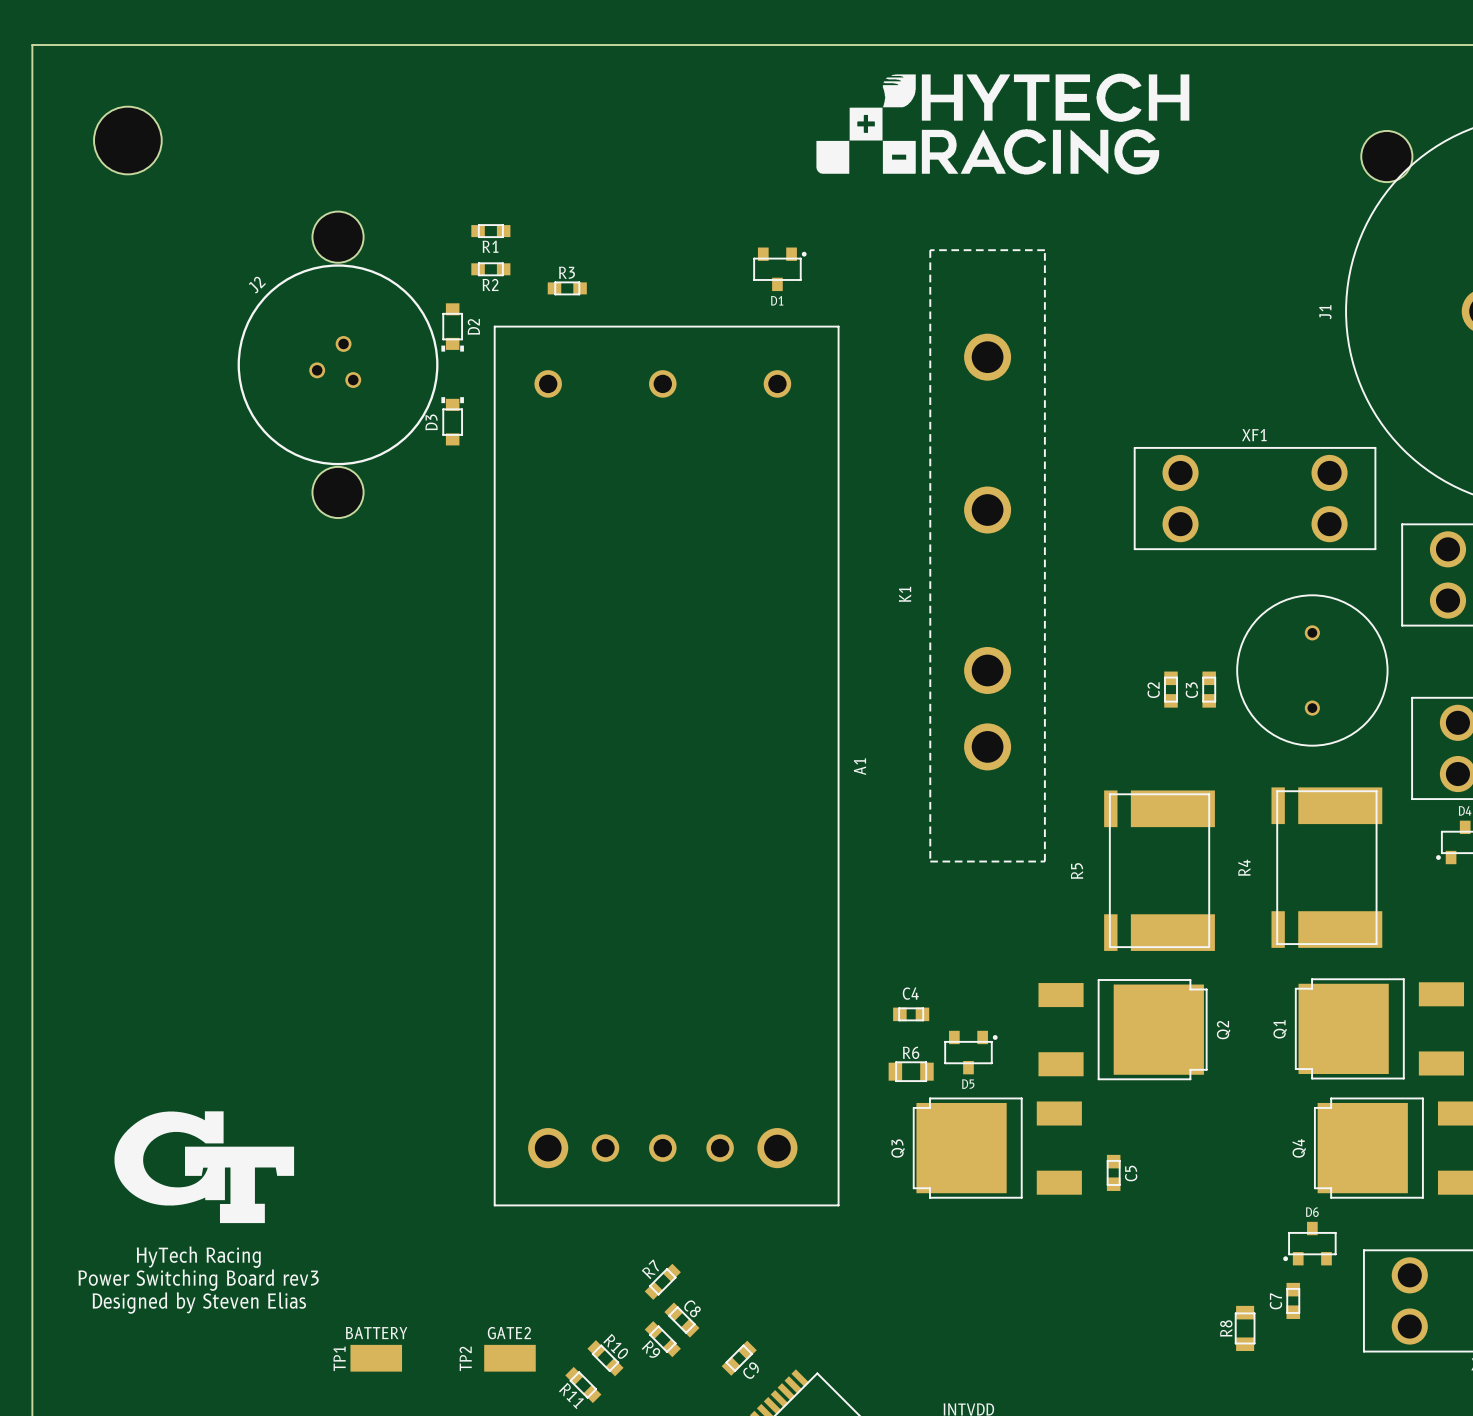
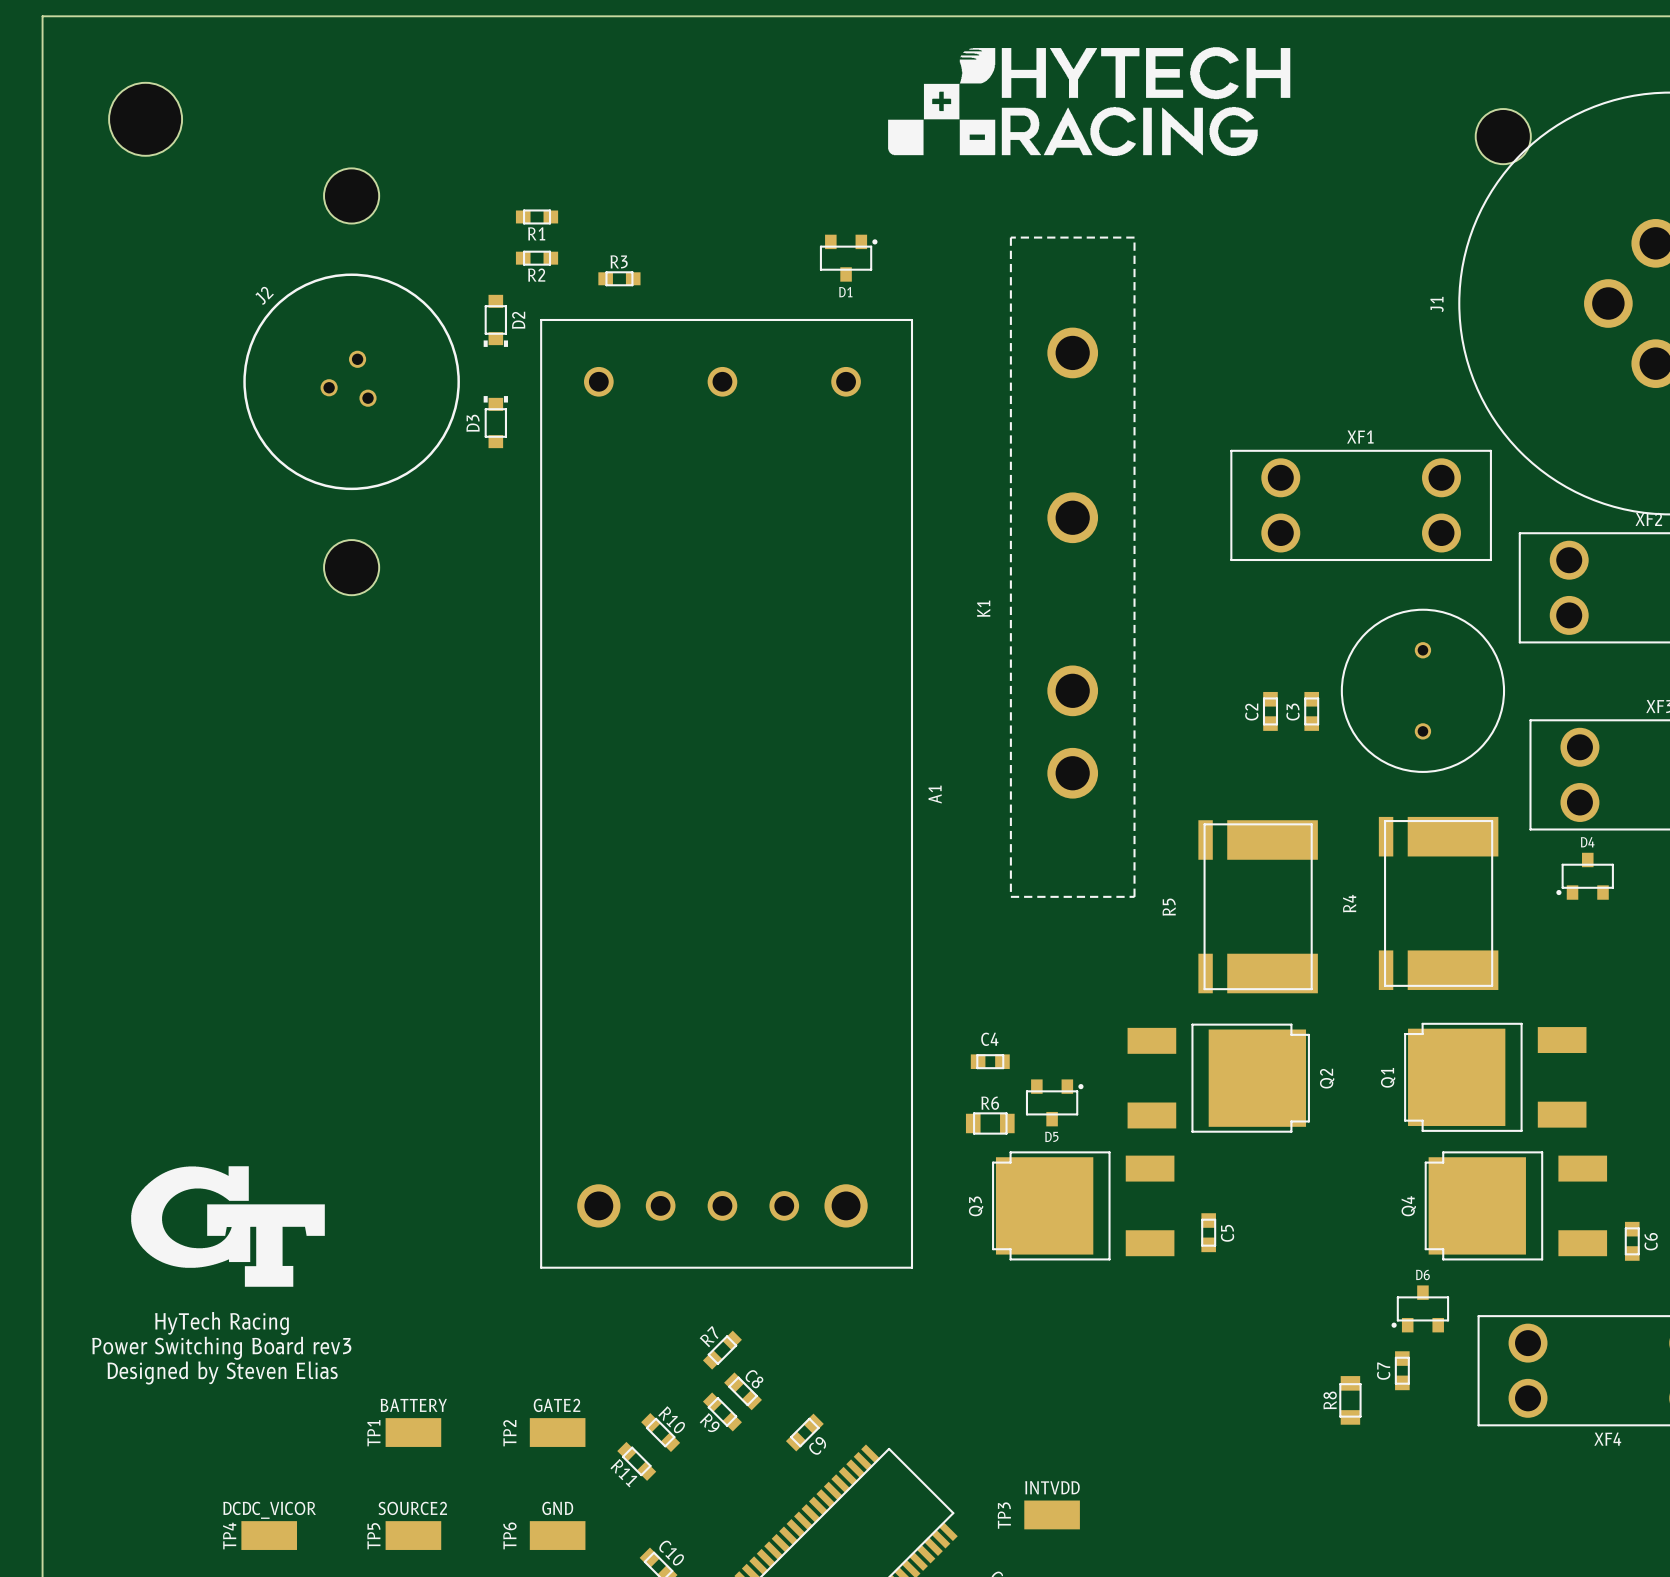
J2 footprint: [237, 211, 439, 519] -> [243, 168, 460, 596]

